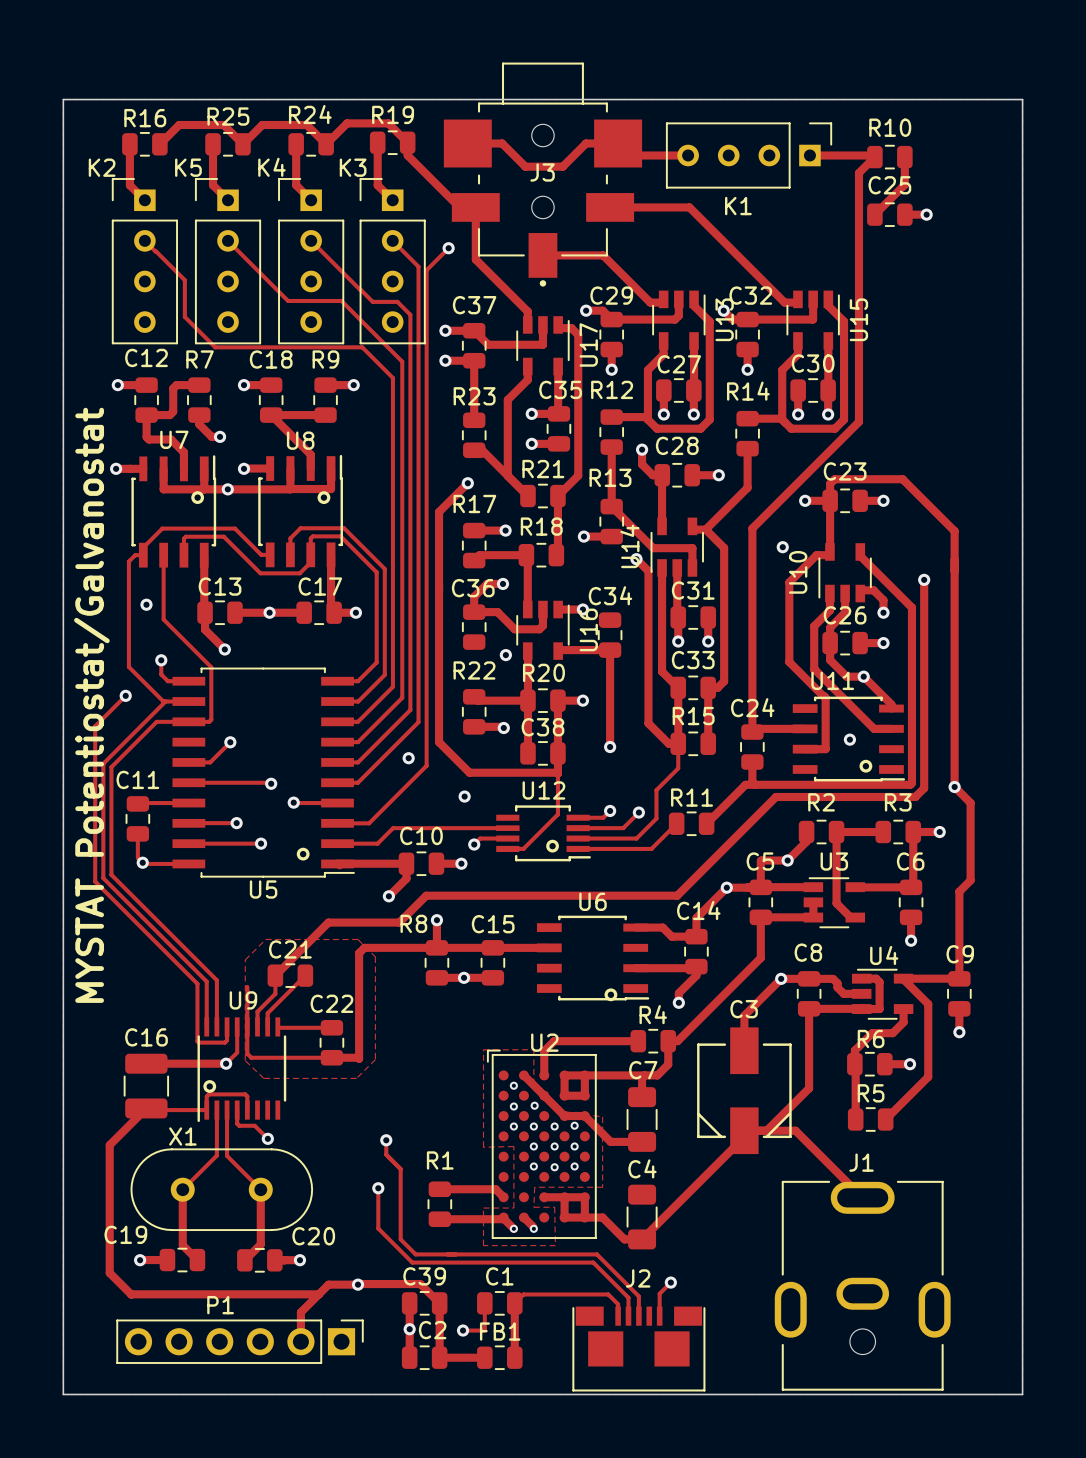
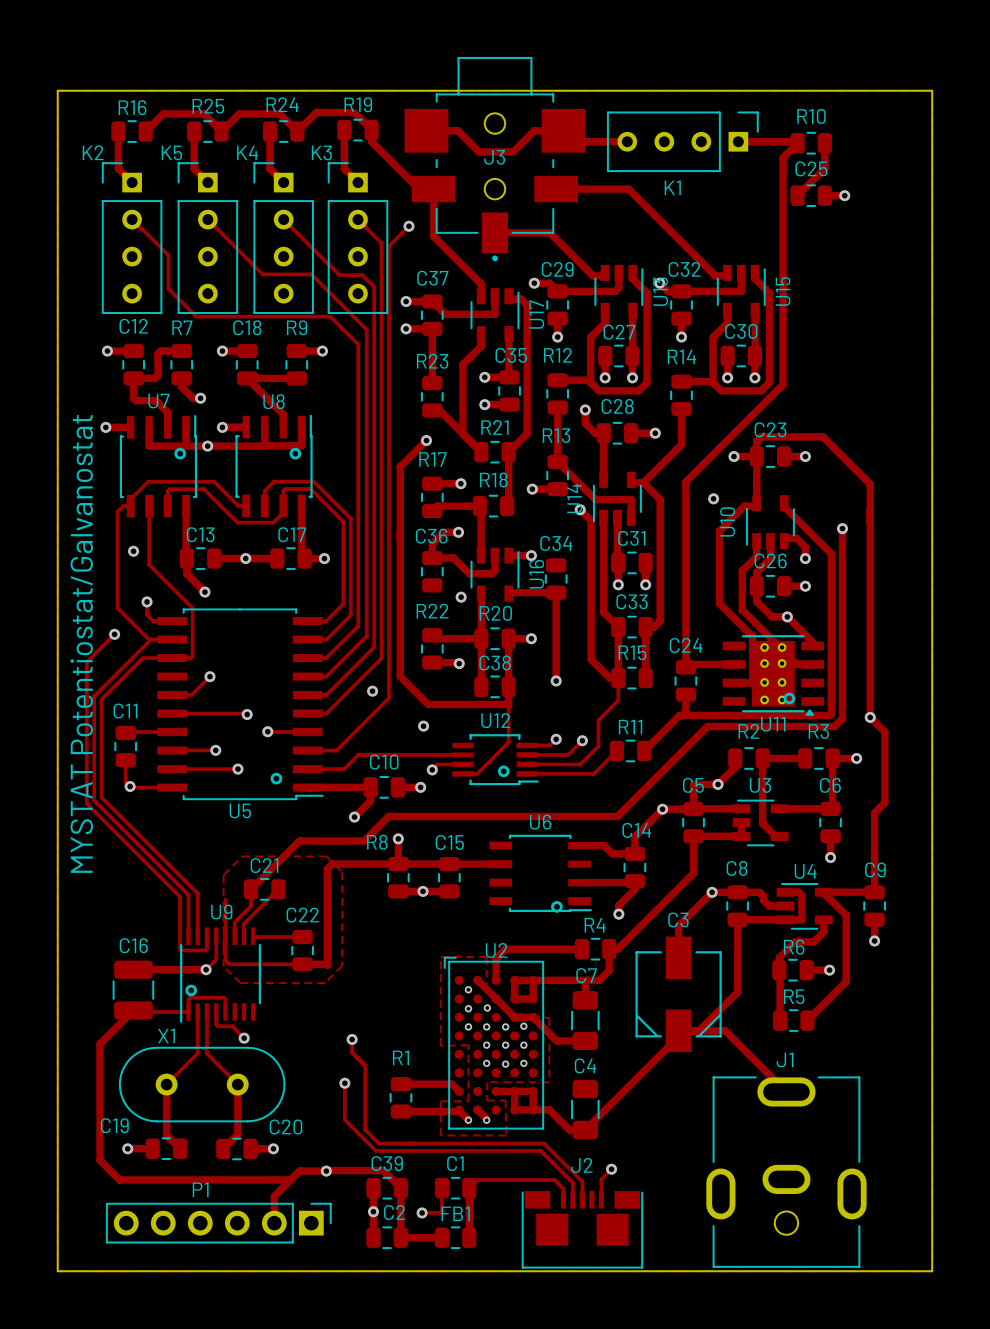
U11 name position: U11 (832, 680) -> U11 (773, 724)
U11 footprint: [792, 696, 906, 782] -> [722, 635, 824, 716]
via: (849, 739) -> none

